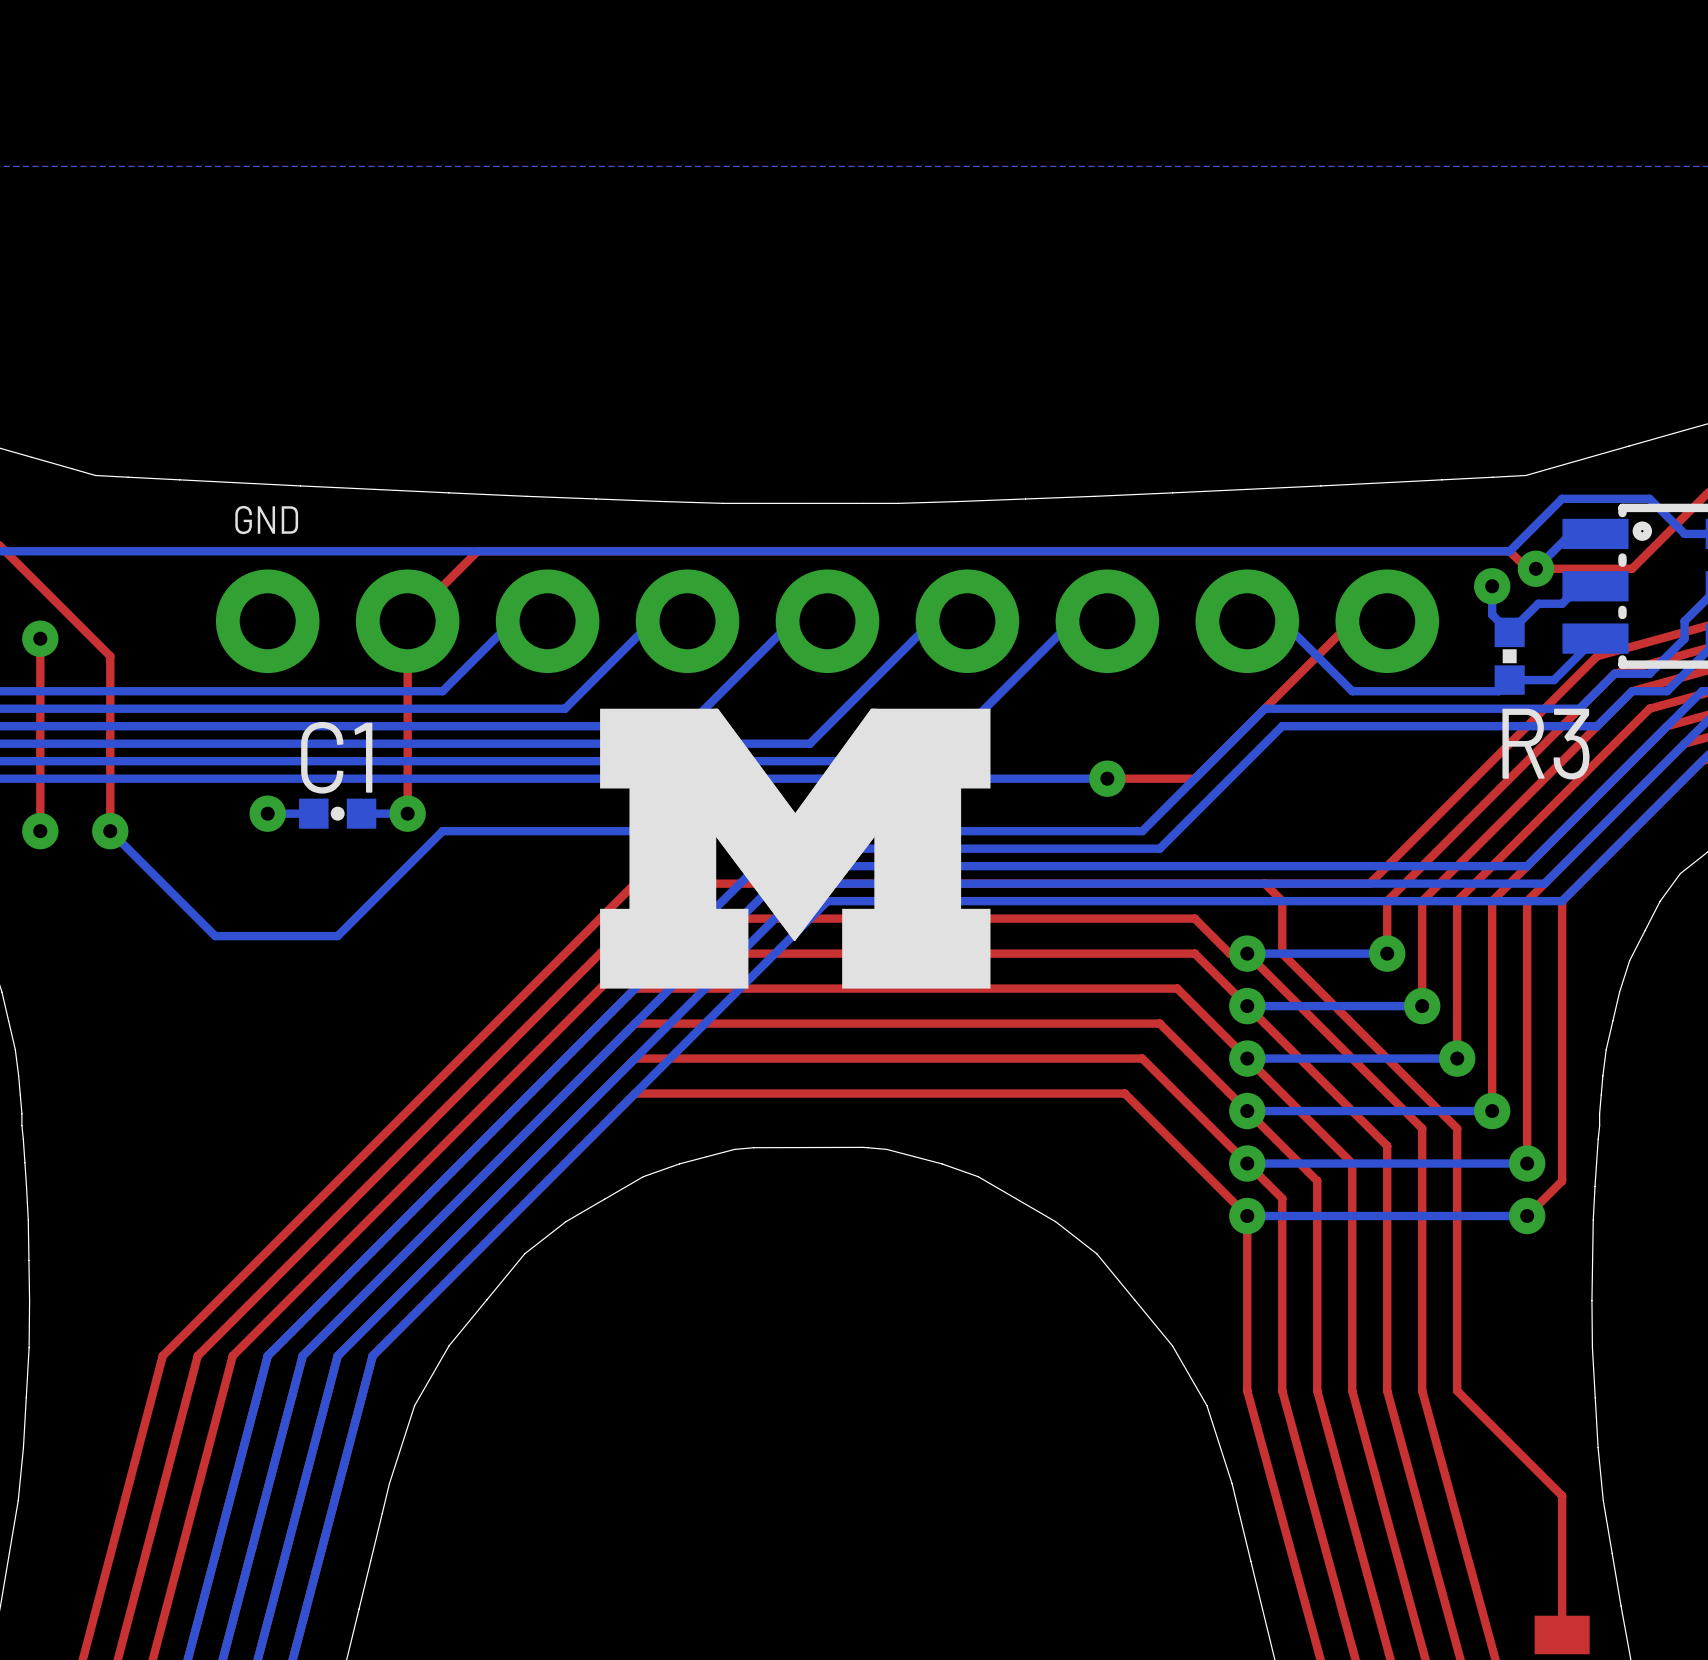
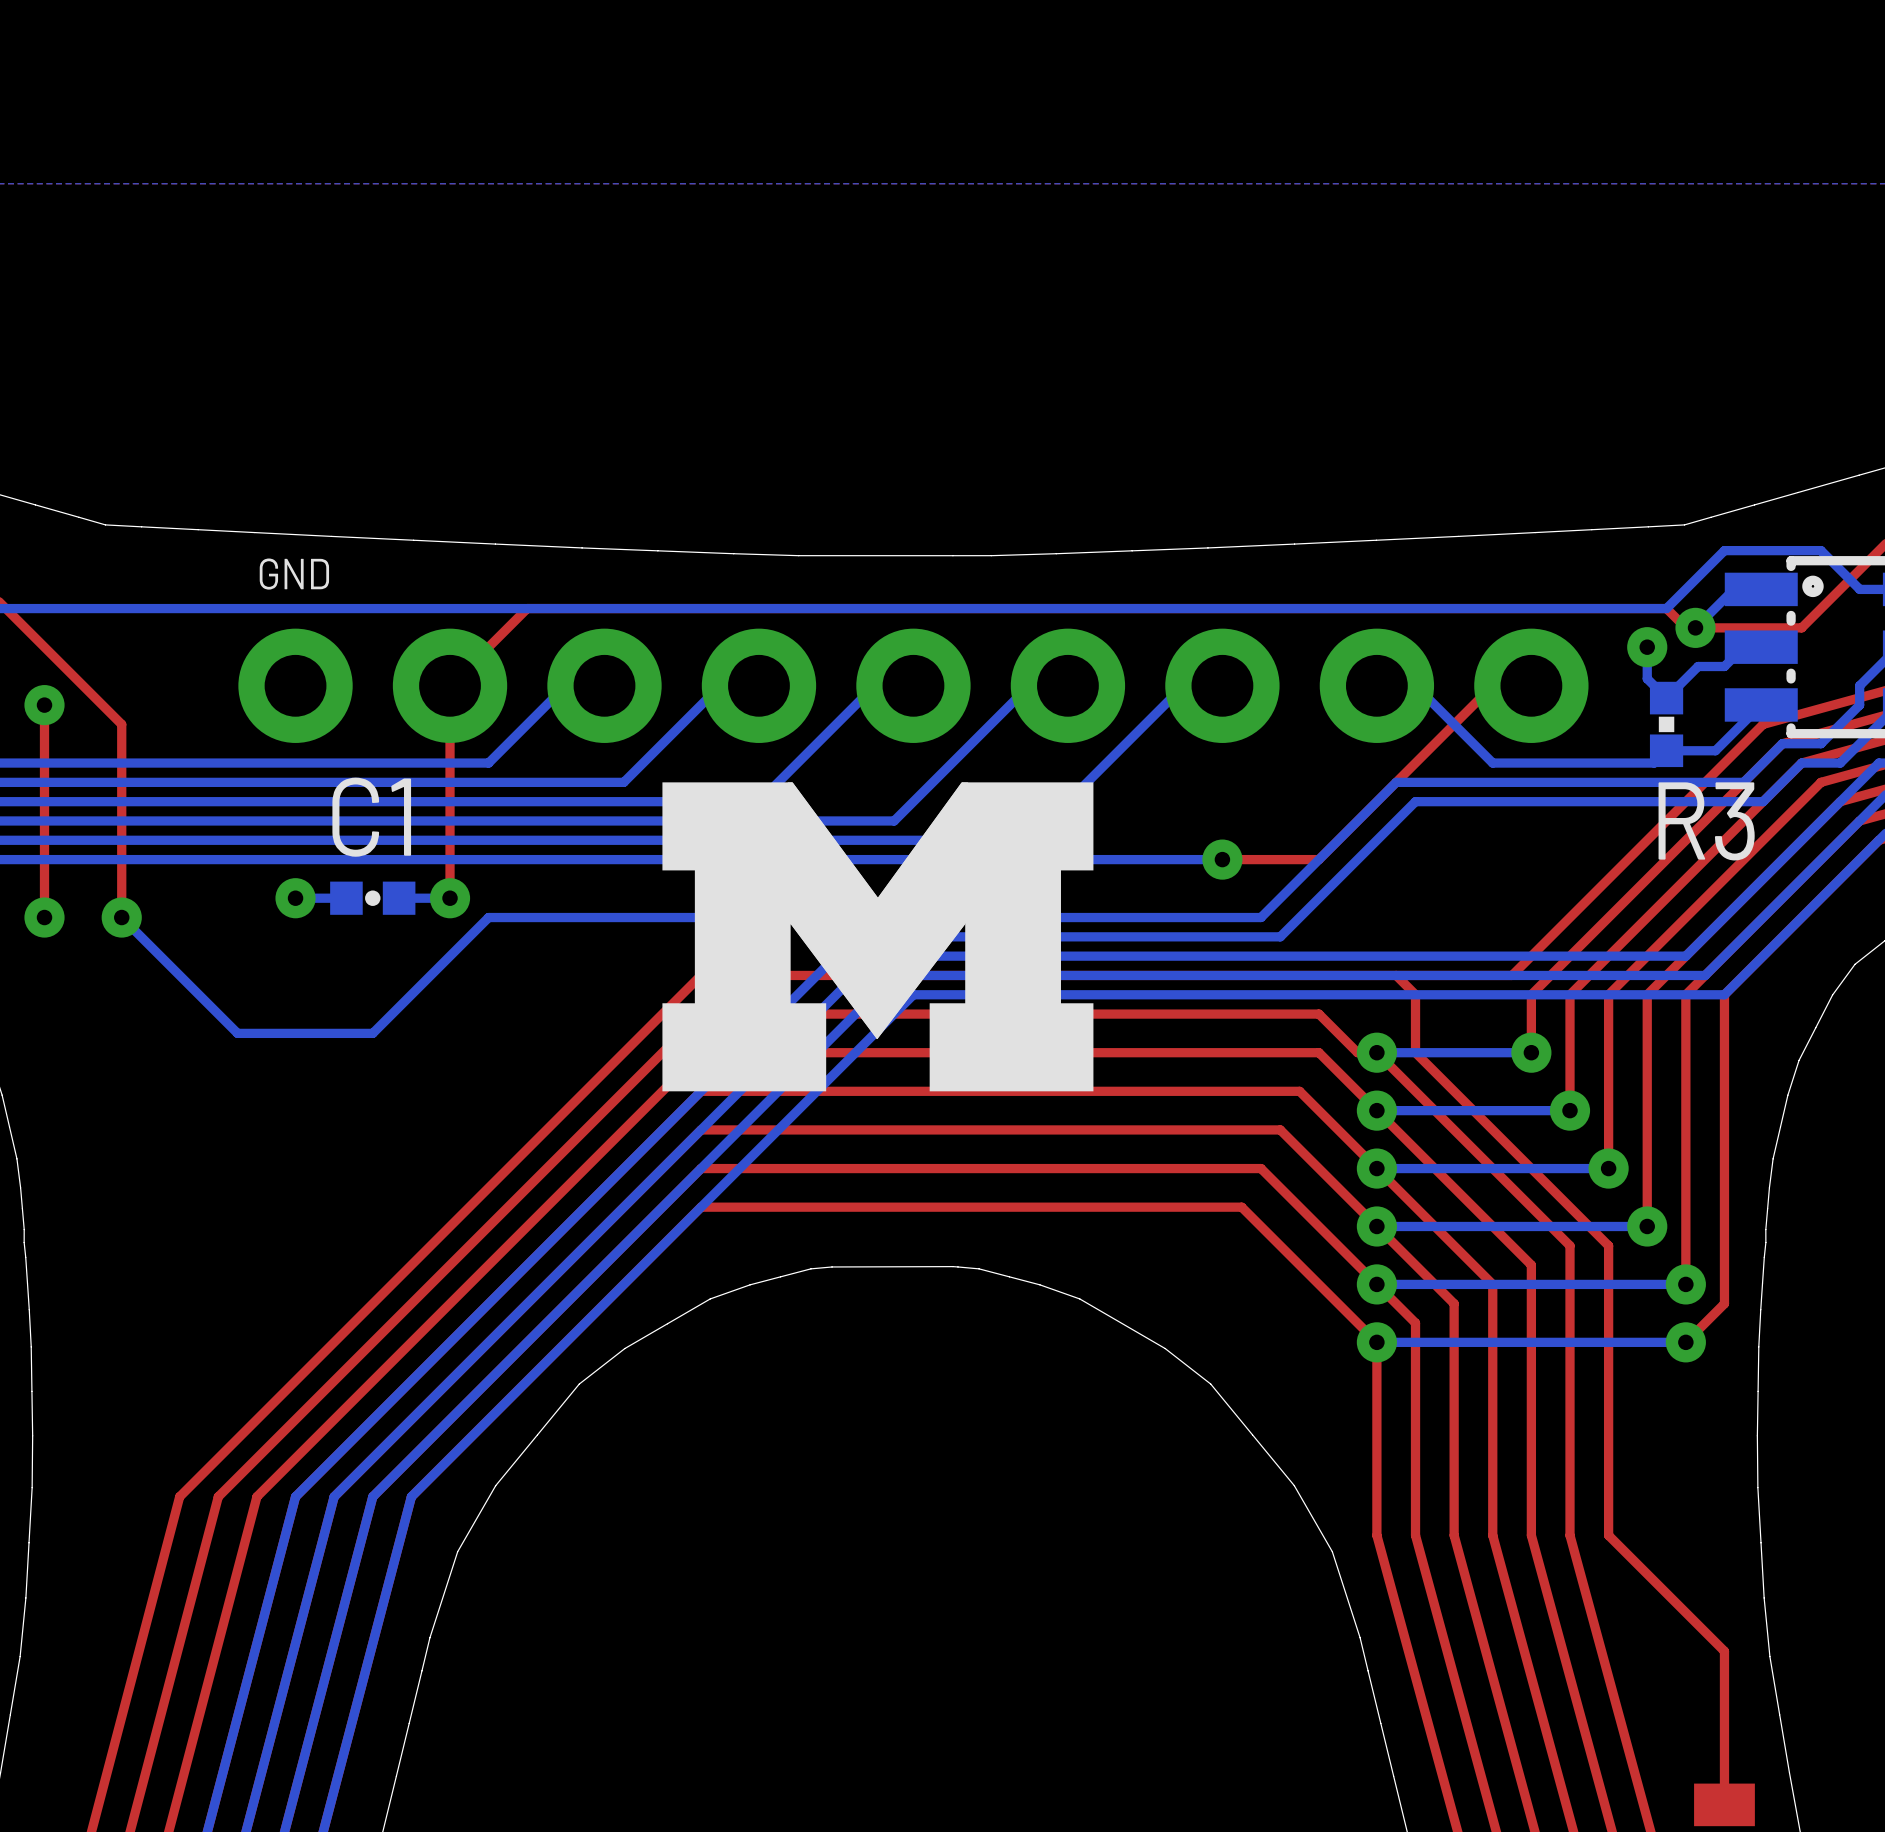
C1 name position: C1 (336, 757) -> C1 (371, 817)

